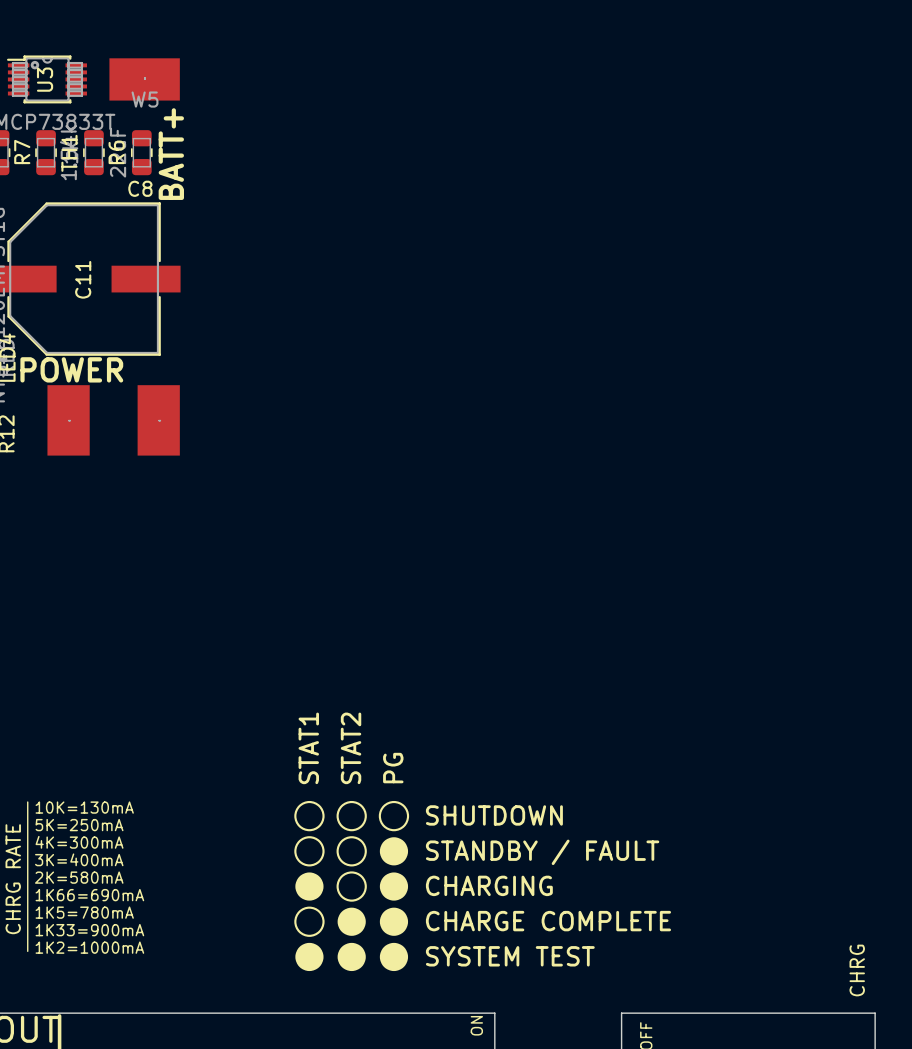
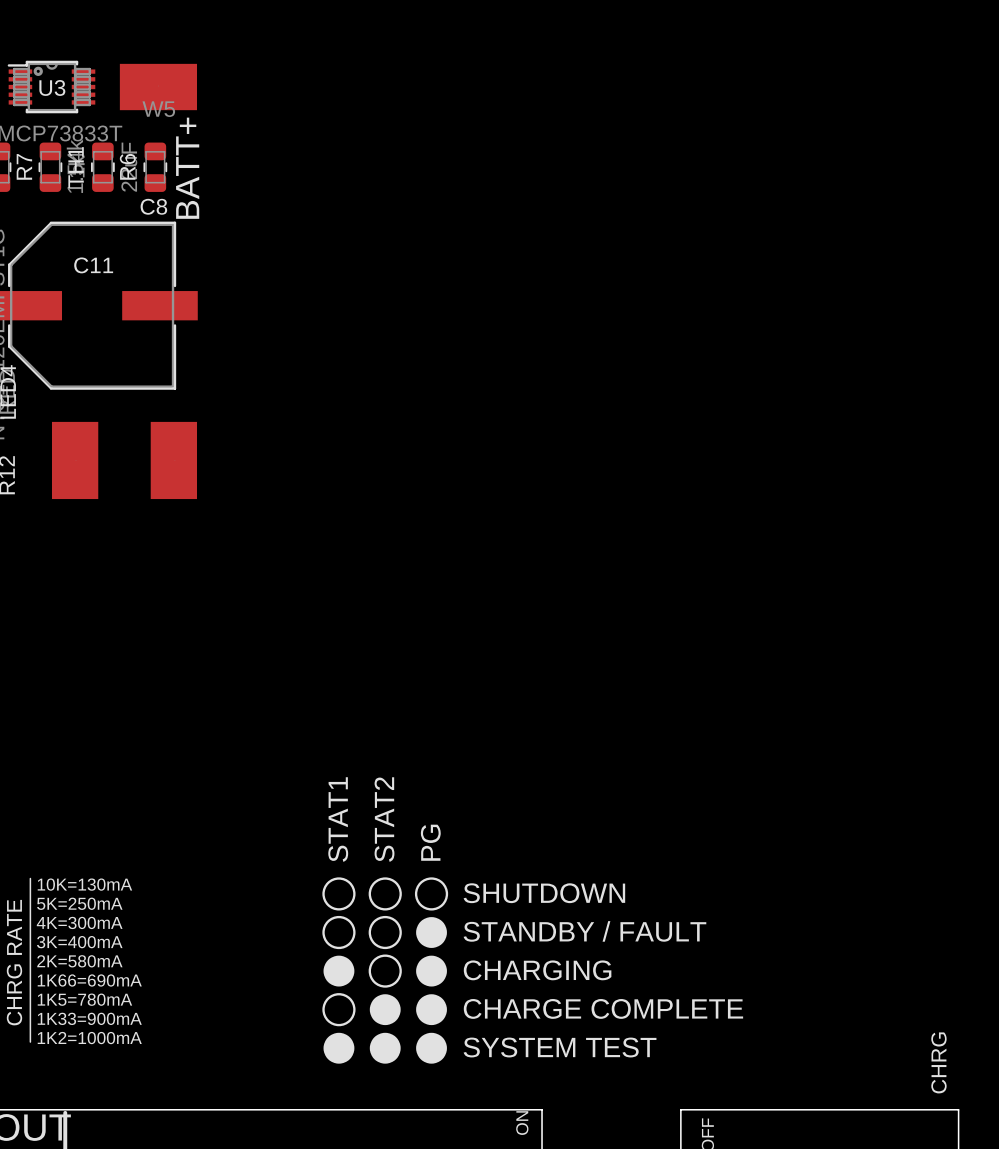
U3 name rotation: 0° (45, 79) -> 90° clockwise (52, 87)
C11 name rotation: 0° (83, 279) -> 90° clockwise (93, 265)
text: POWER (71, 369) -> none

